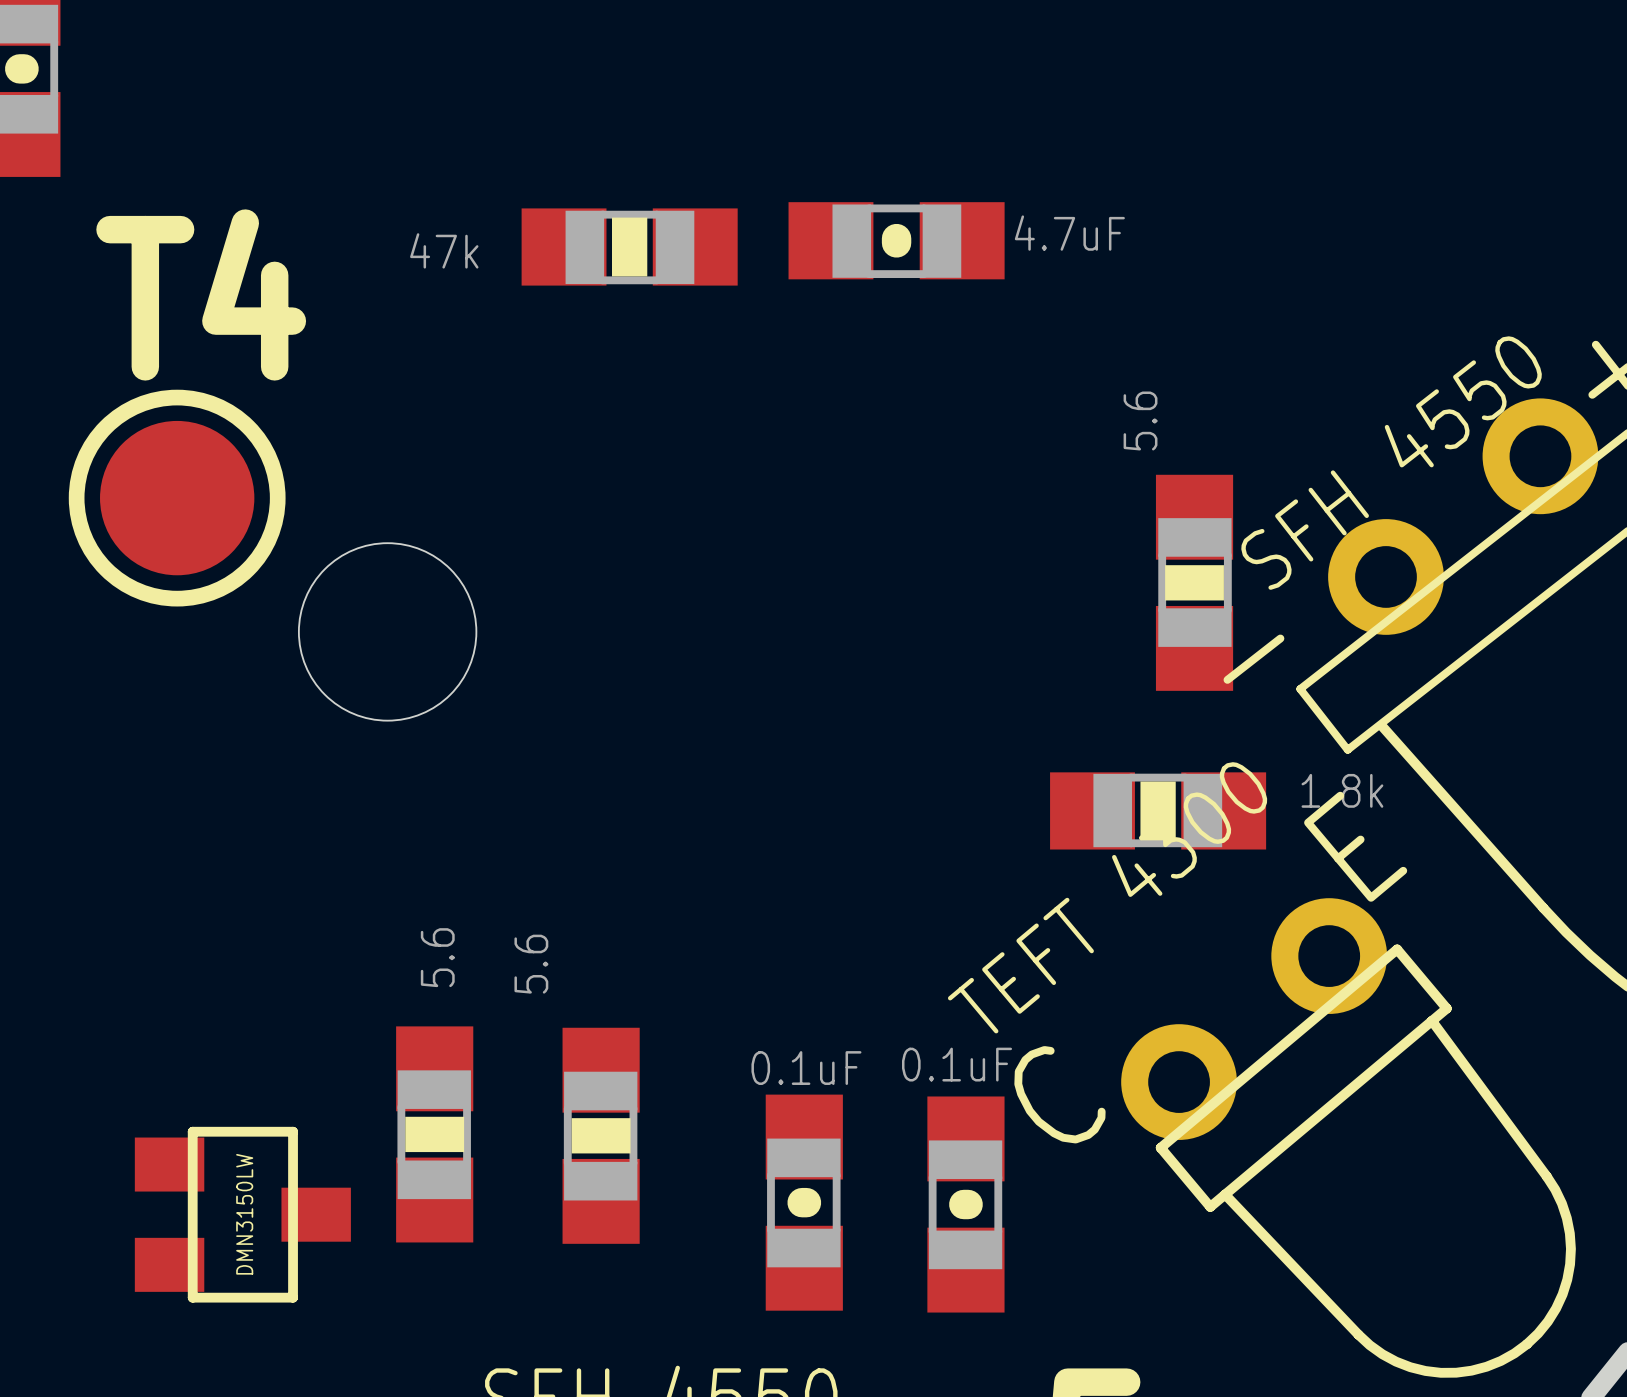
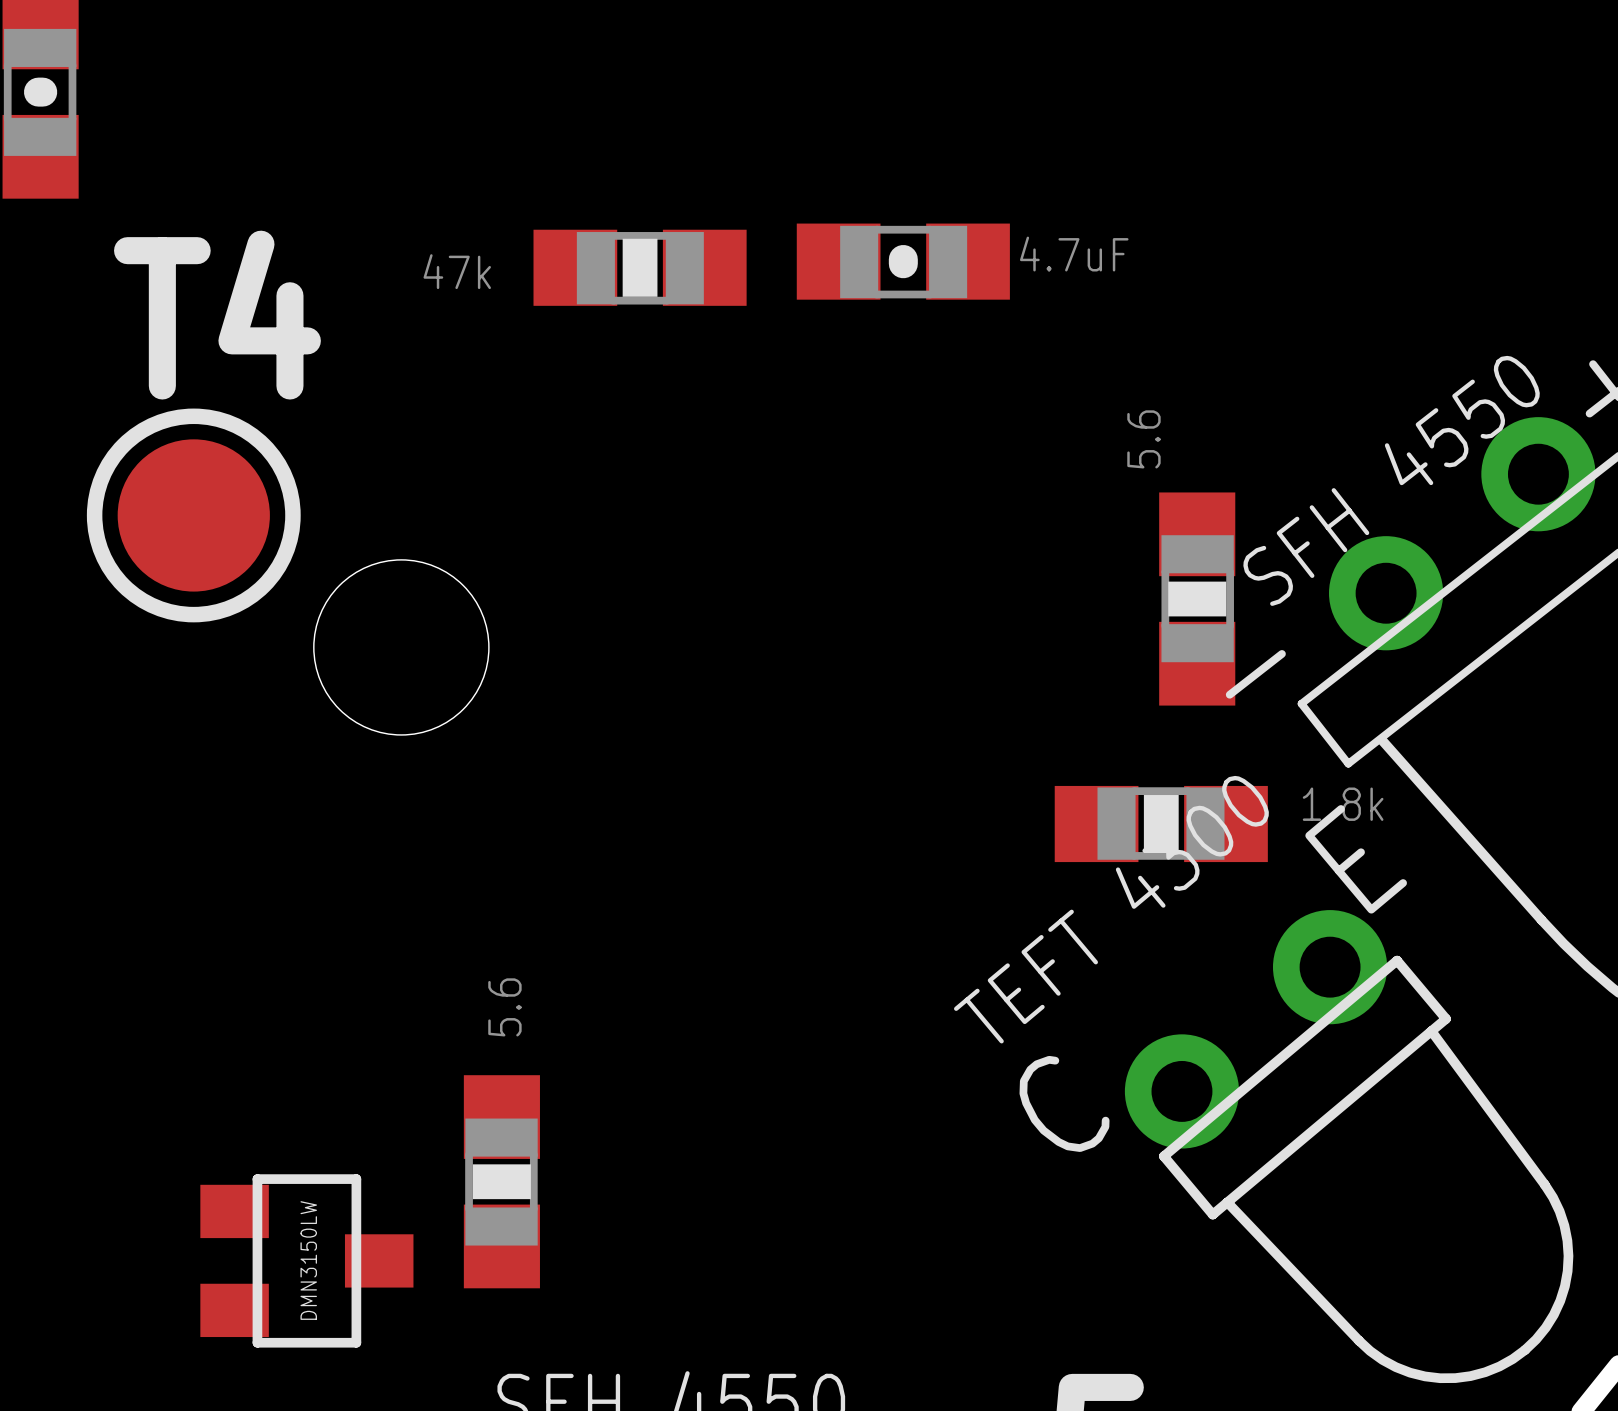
part: 5.6 (434, 1134) -> none
part: 5.6 (601, 1135) -> none
part: none -> 5.6 (501, 1181)
part: 0.1uF (804, 1202) -> none
part: 0.1uF (965, 1204) -> none
part position: (242, 1214) -> (306, 1260)

